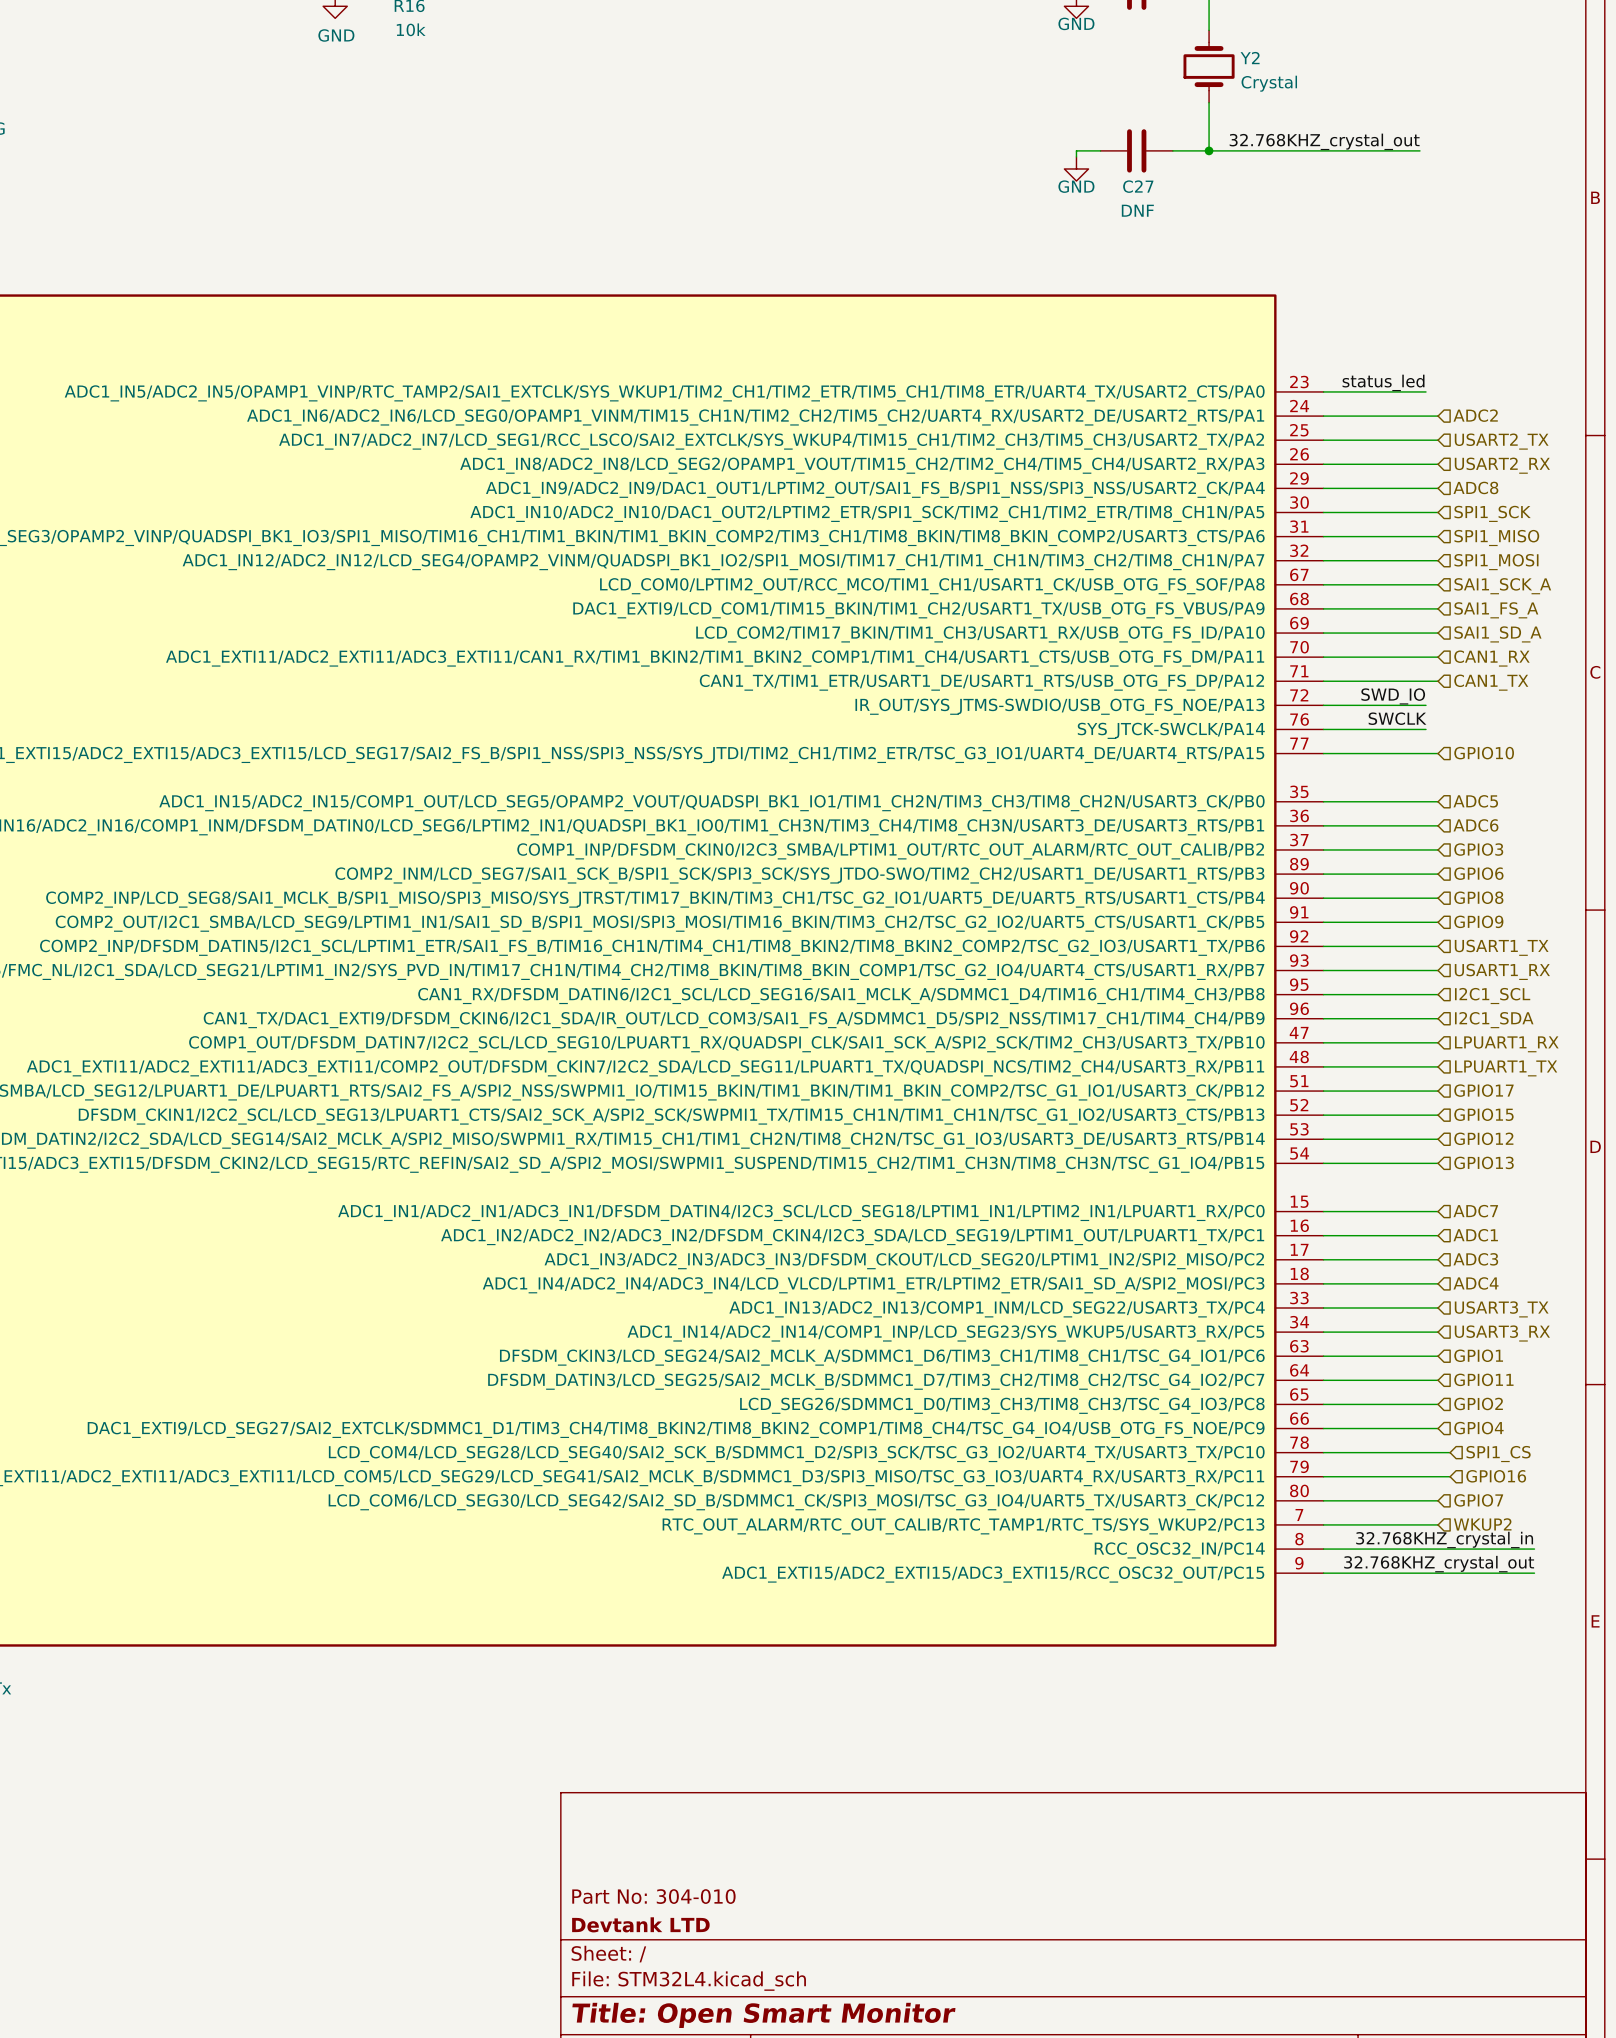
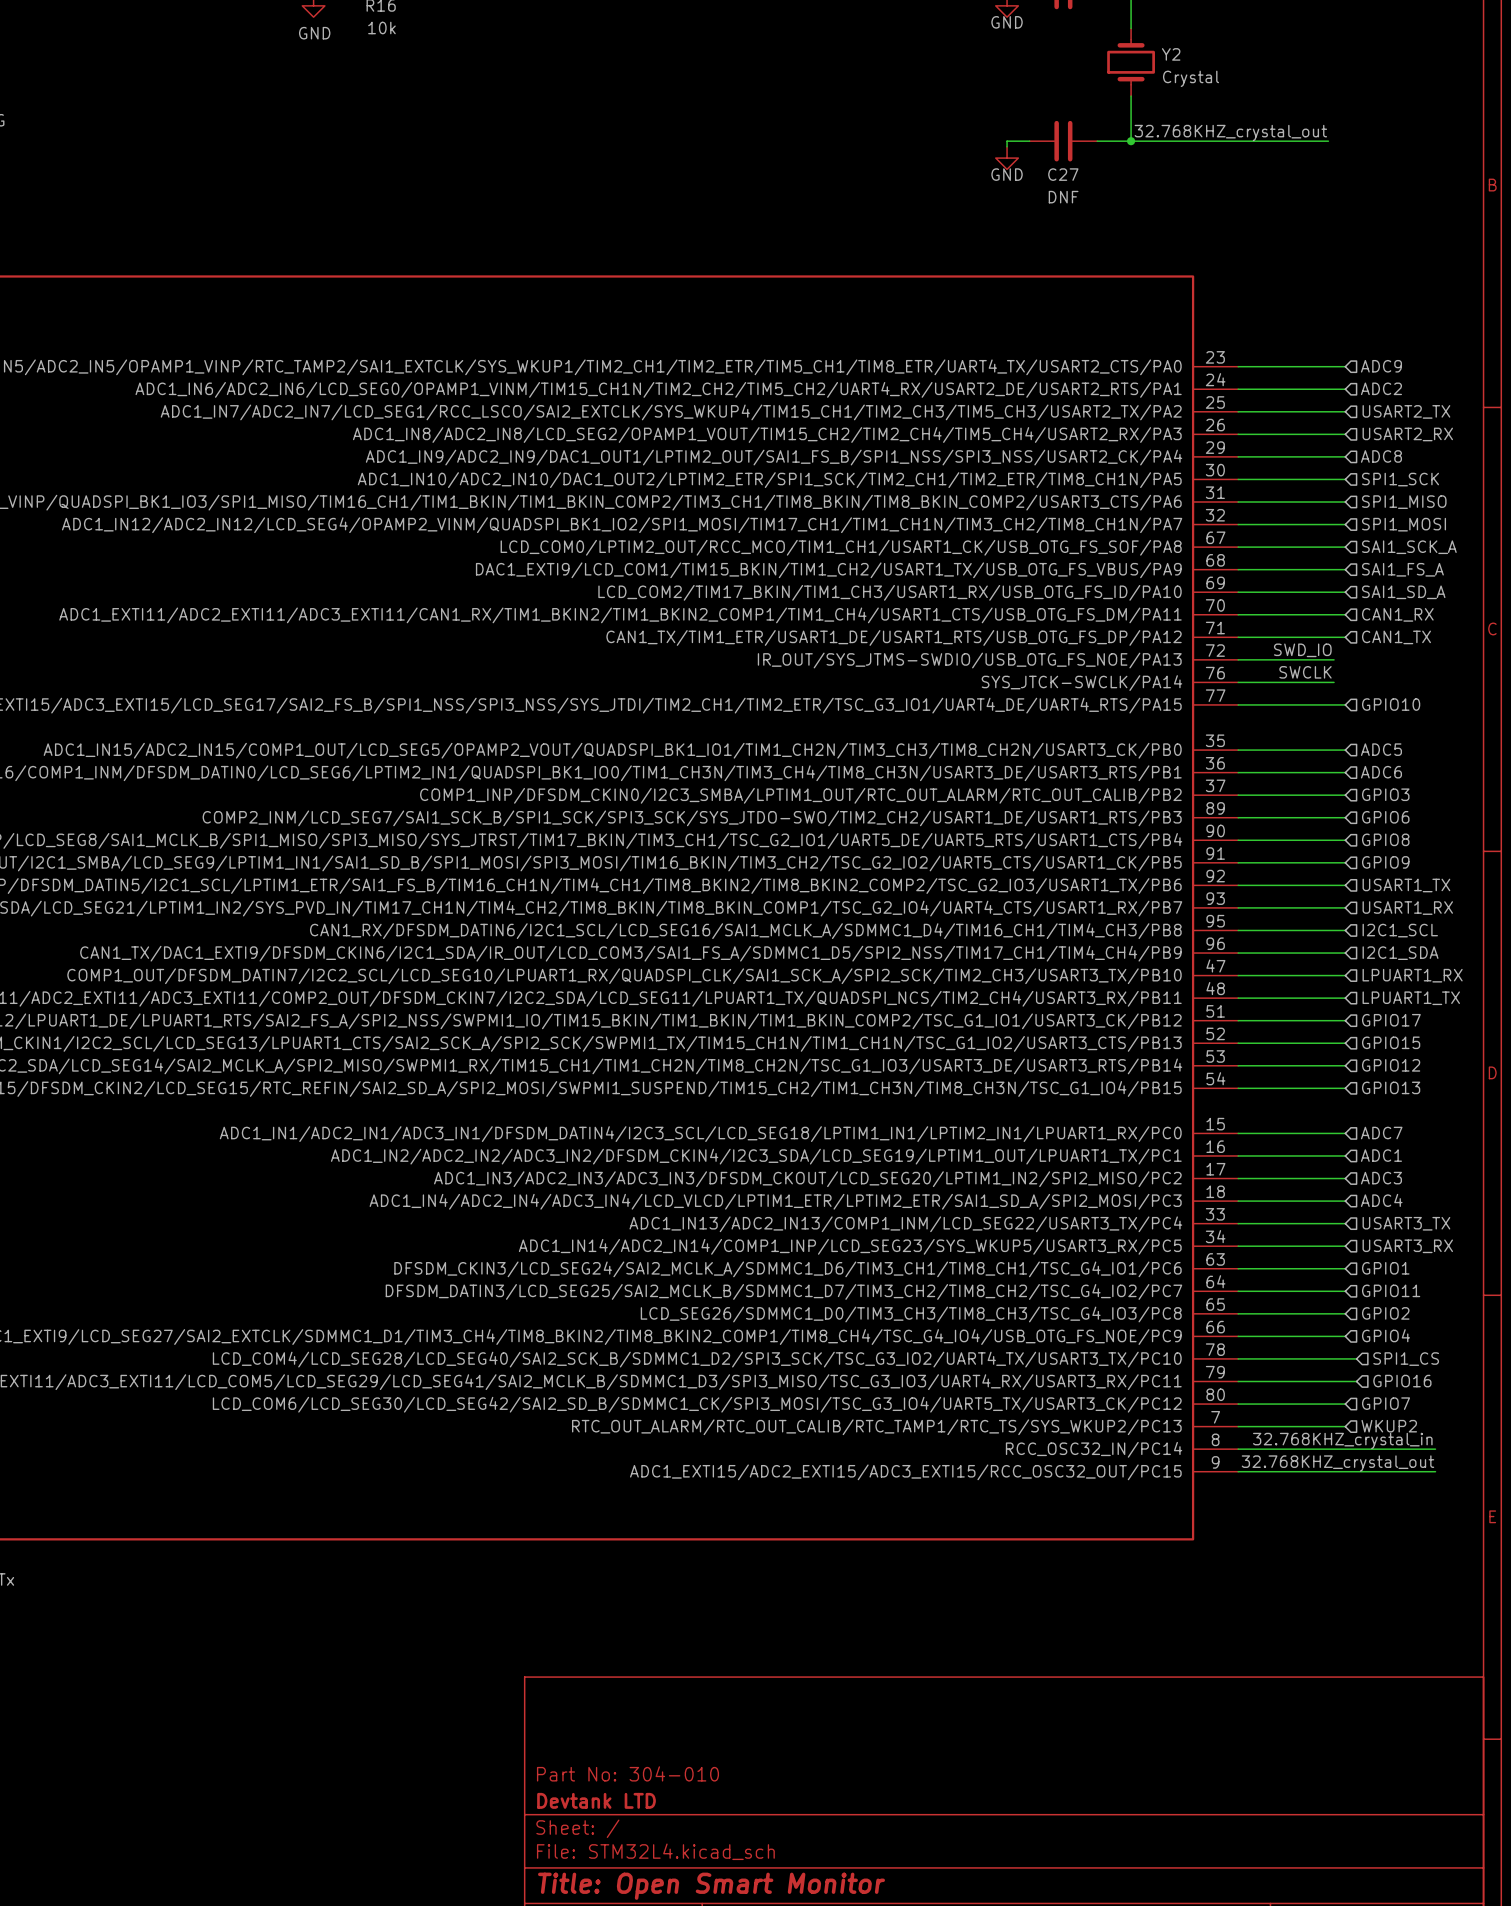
label: status_led (1383, 382) -> none
wire: none -> (1334, 366) (1345, 366)
hierarchical label: none -> ADC9 (1381, 366)

